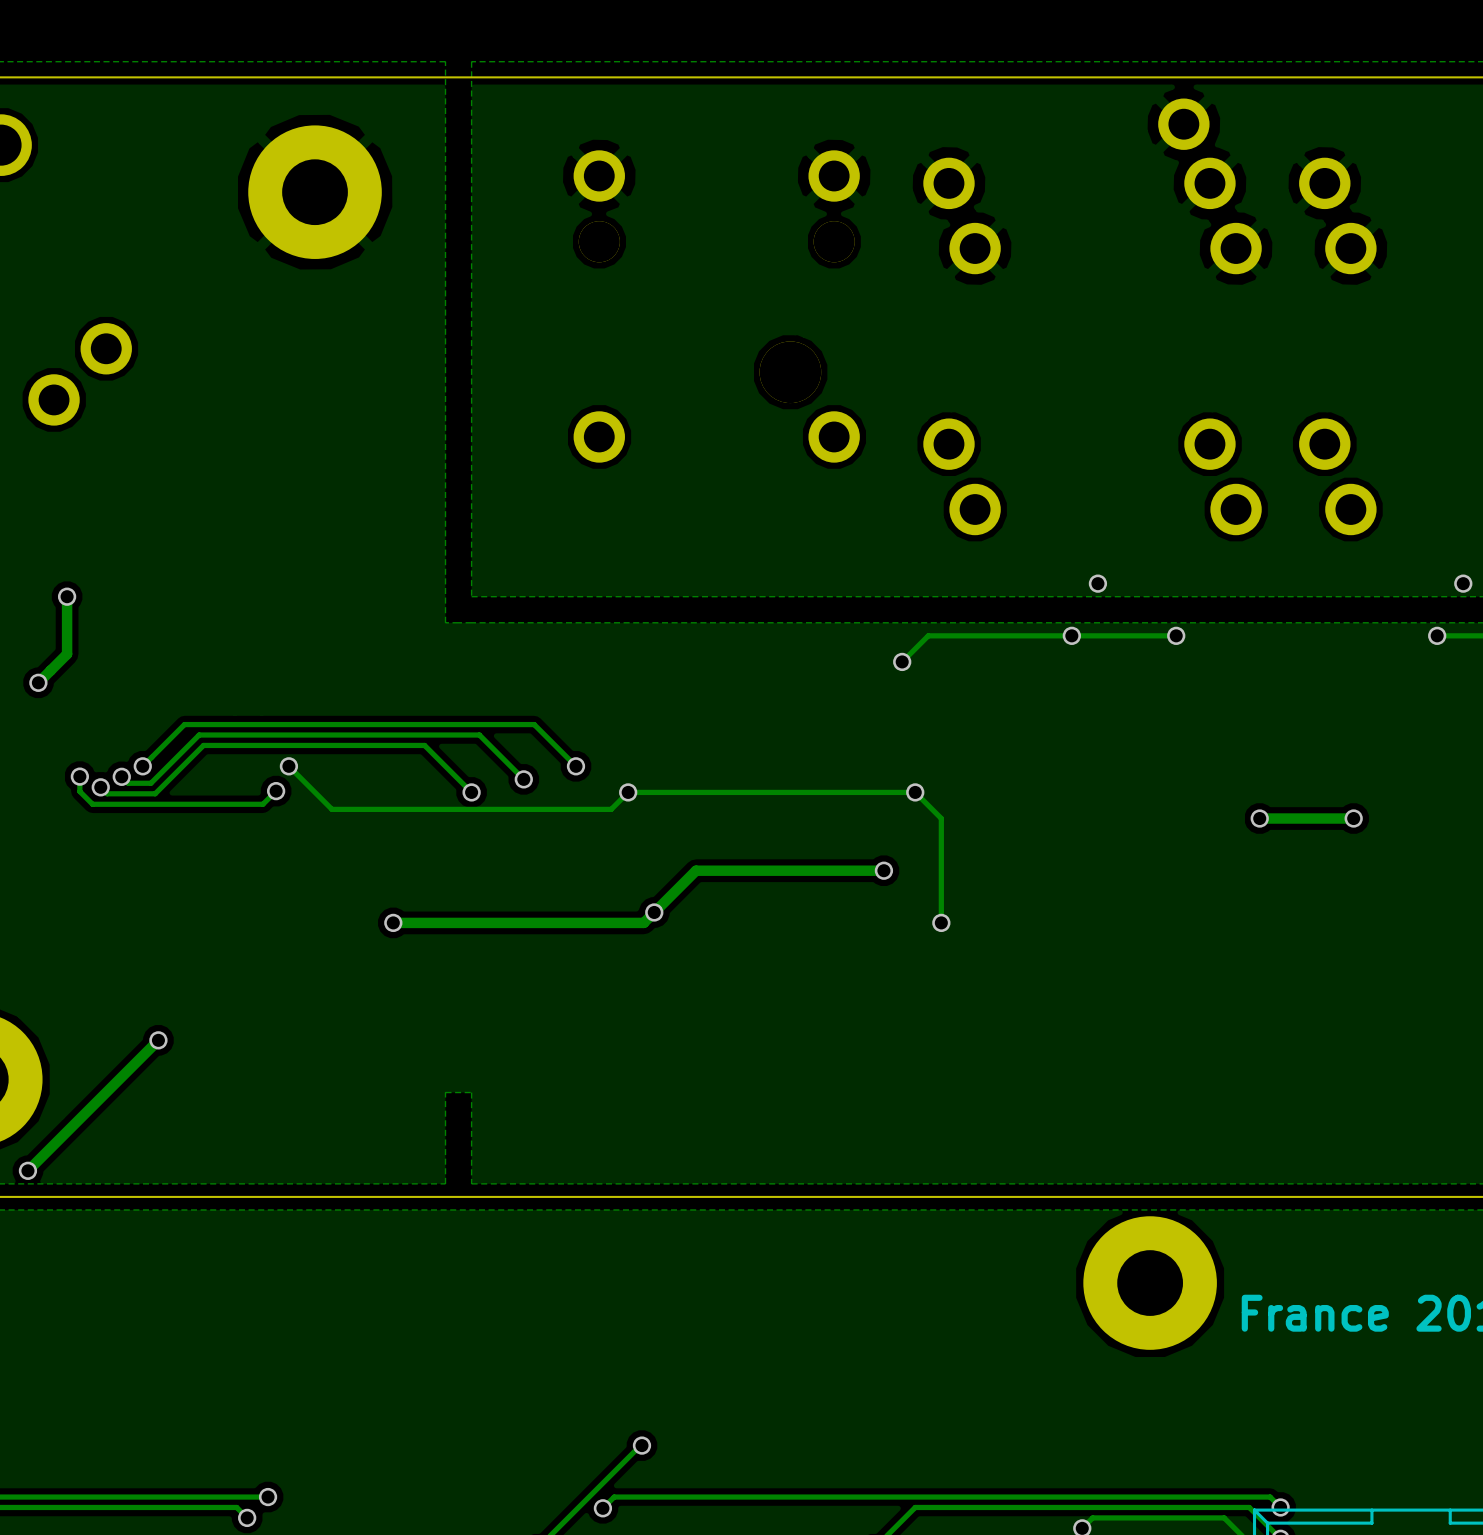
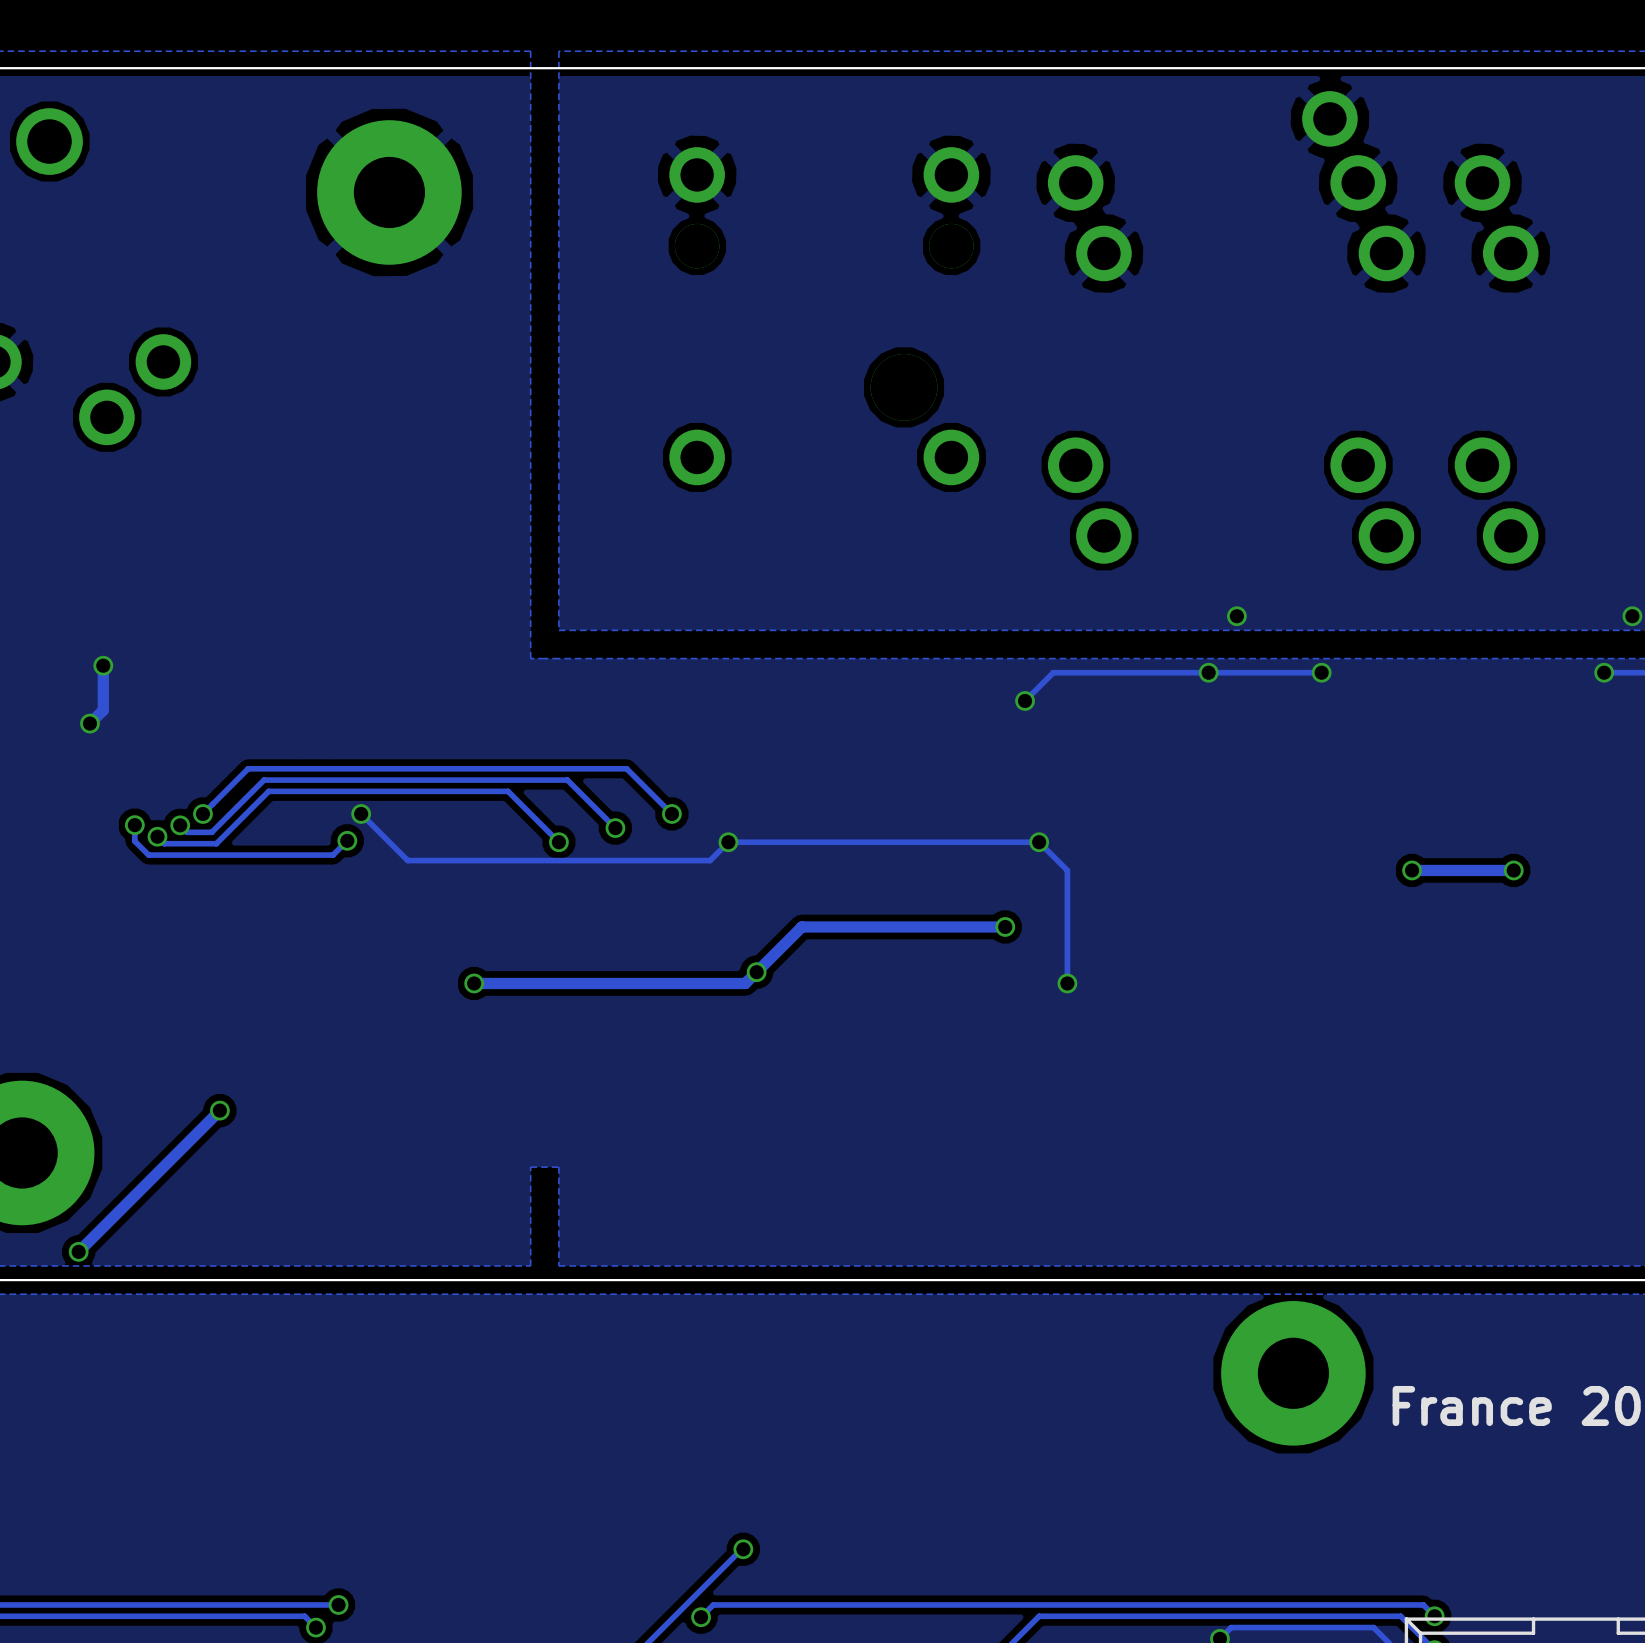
track: (67, 596) (67, 654) (50, 670) -> (103, 665) (103, 710)
via position: (67, 596) -> (103, 665)

